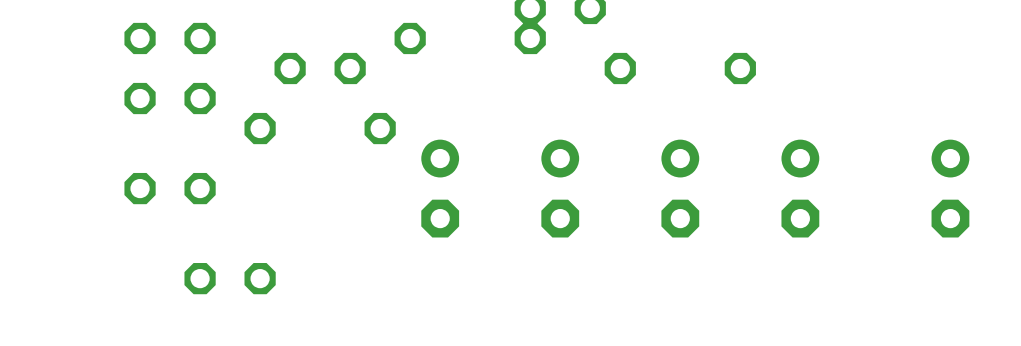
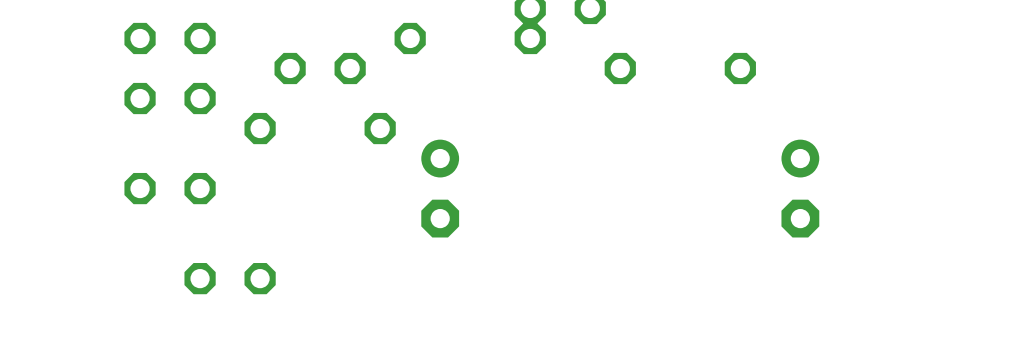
part: (560, 188) -> none
part: (680, 188) -> none
part: (950, 188) -> none

